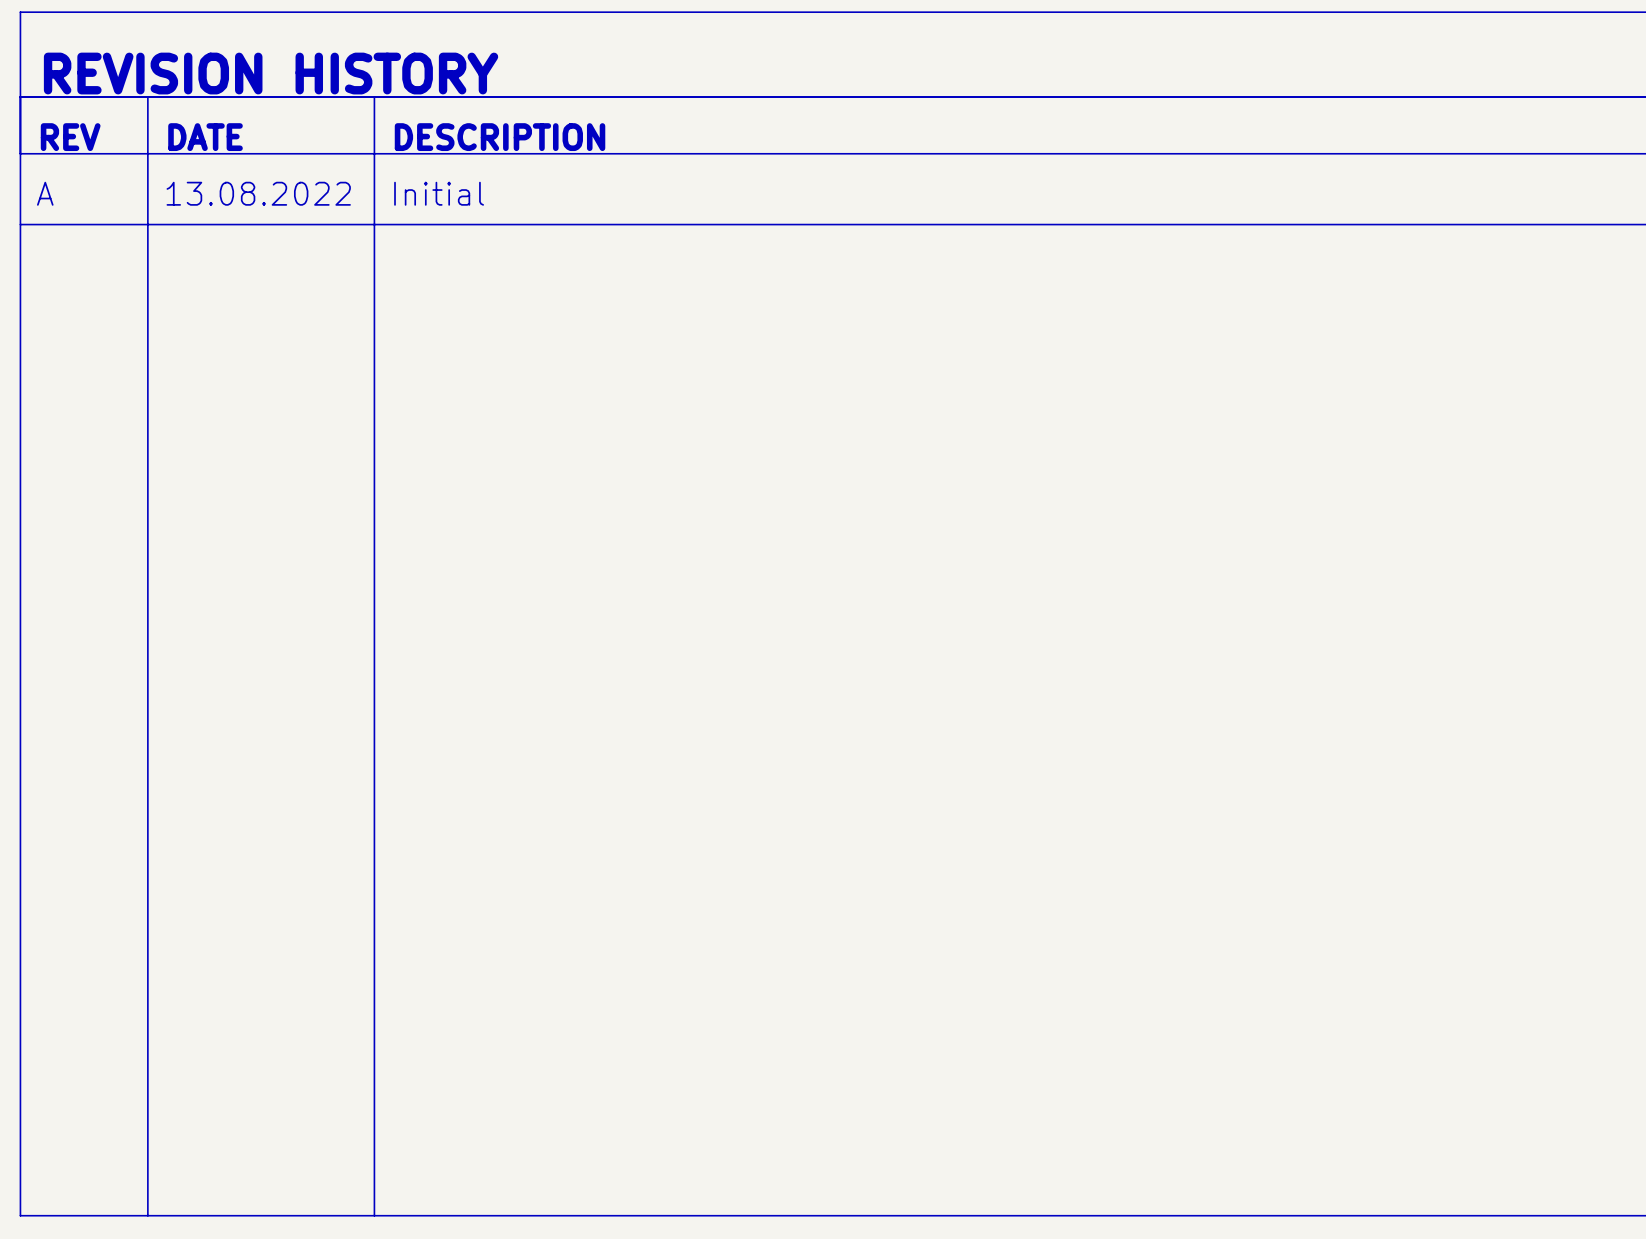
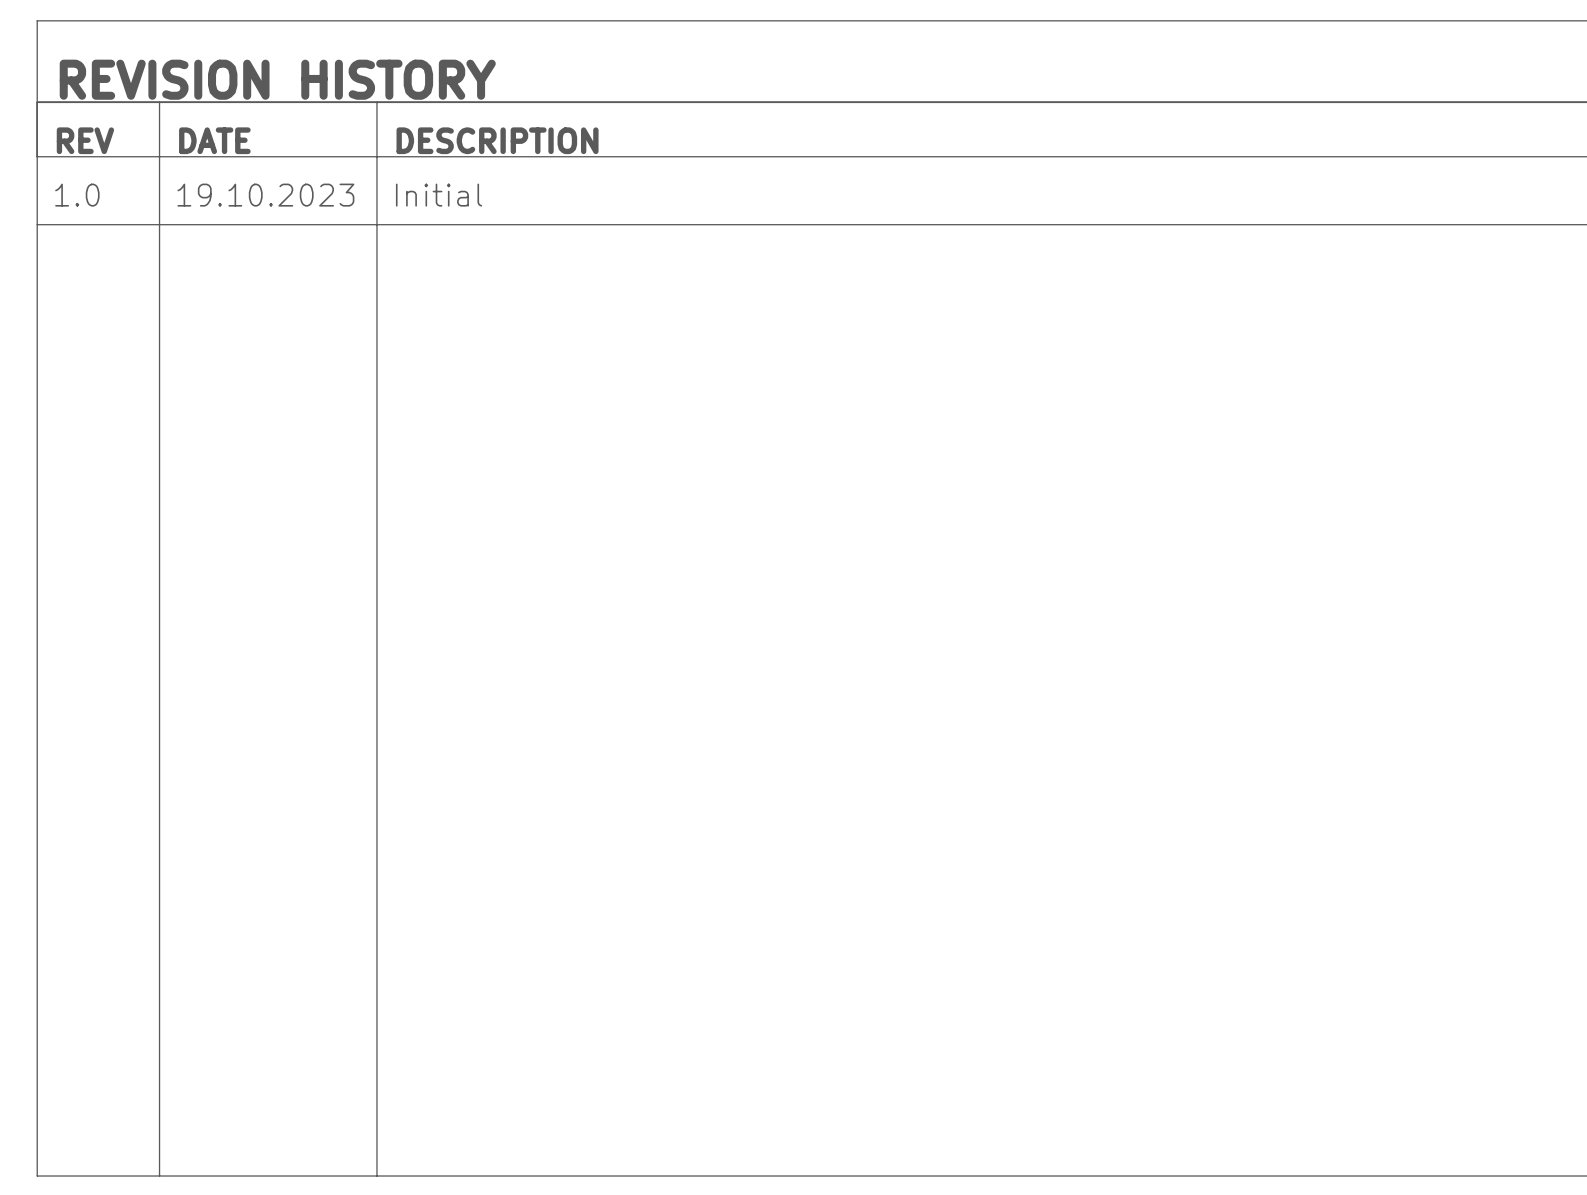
text: A (45, 193) -> 1.0 (77, 195)
text: 13.08.2022 (258, 193) -> 19.10.2023 (265, 195)

